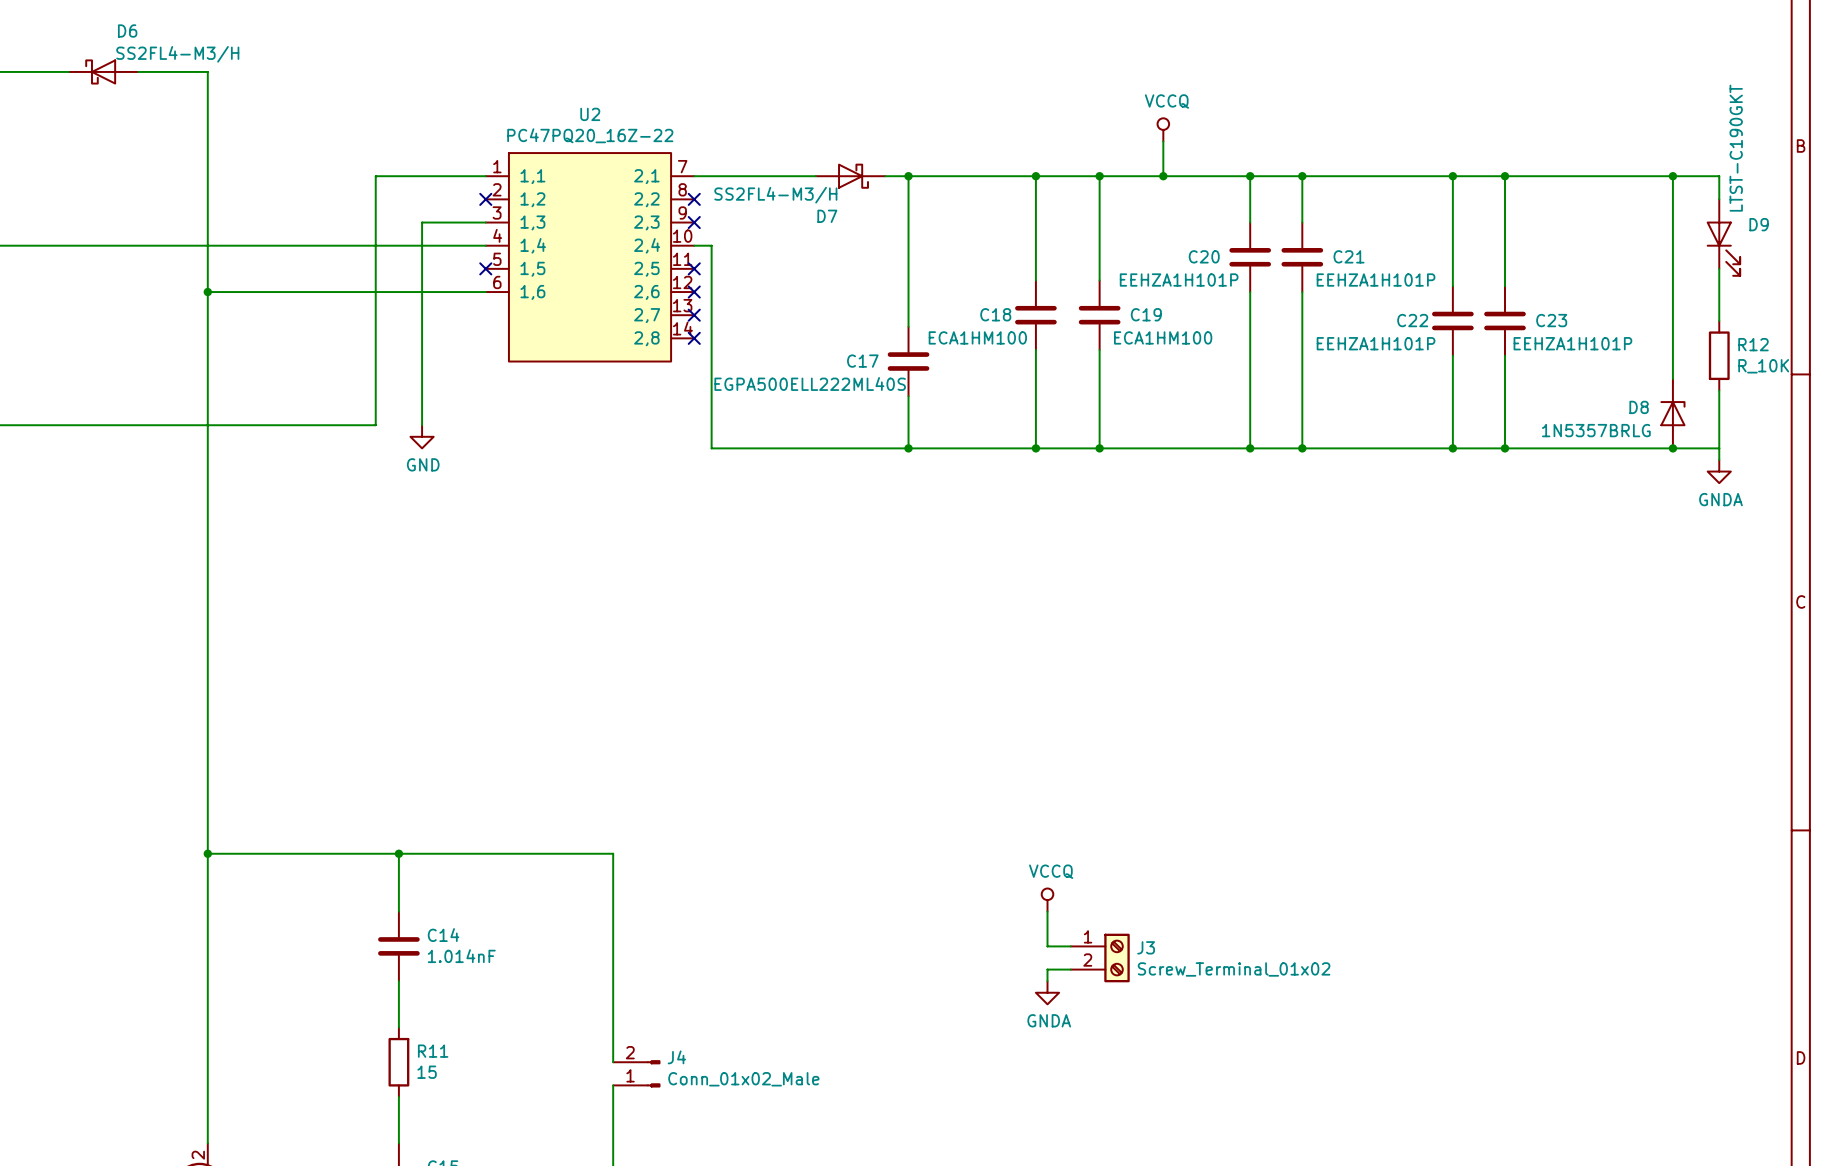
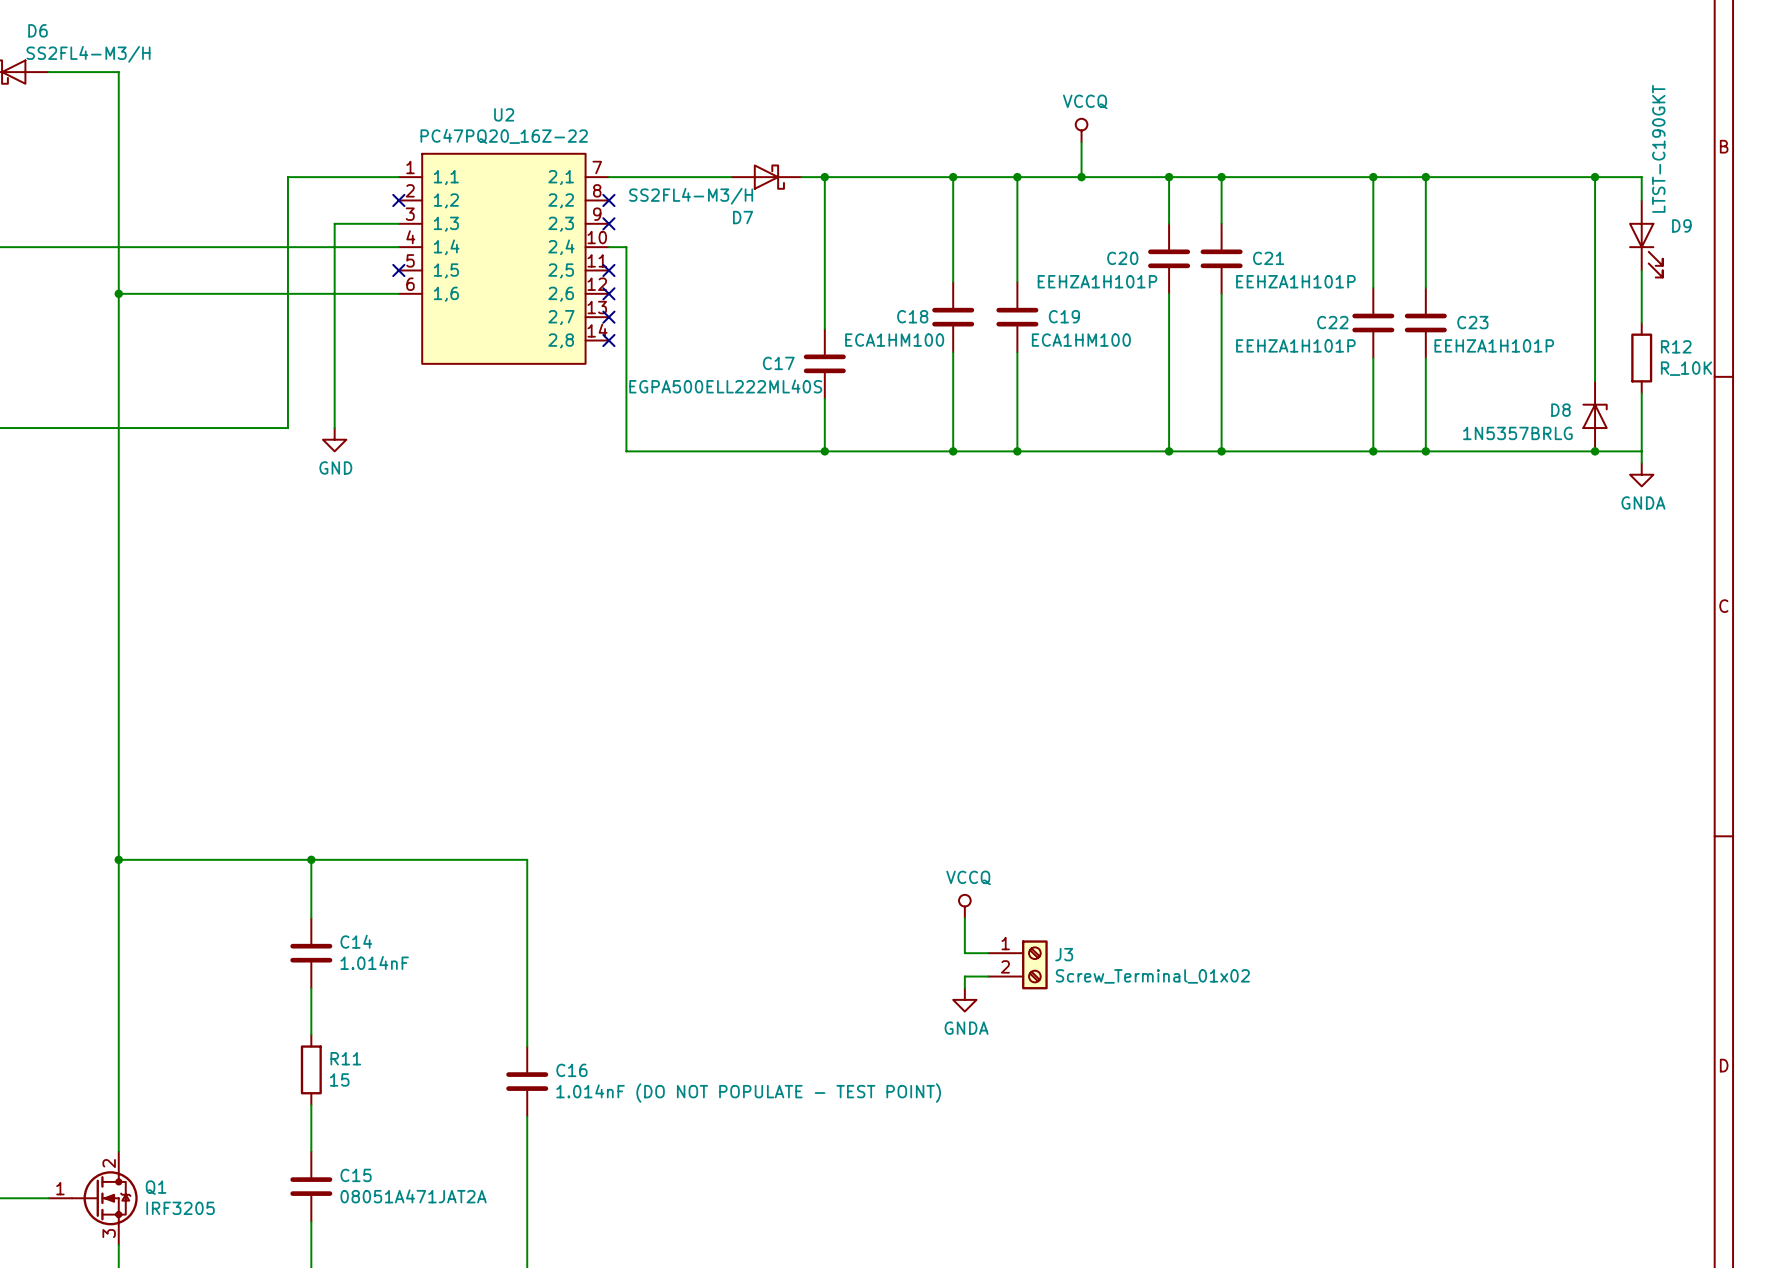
C16: none -> 1.014nF (DO NOT POPULATE - TEST POINT) (527, 1081)
J4: Conn_01x02_Male (636, 1073) -> none

